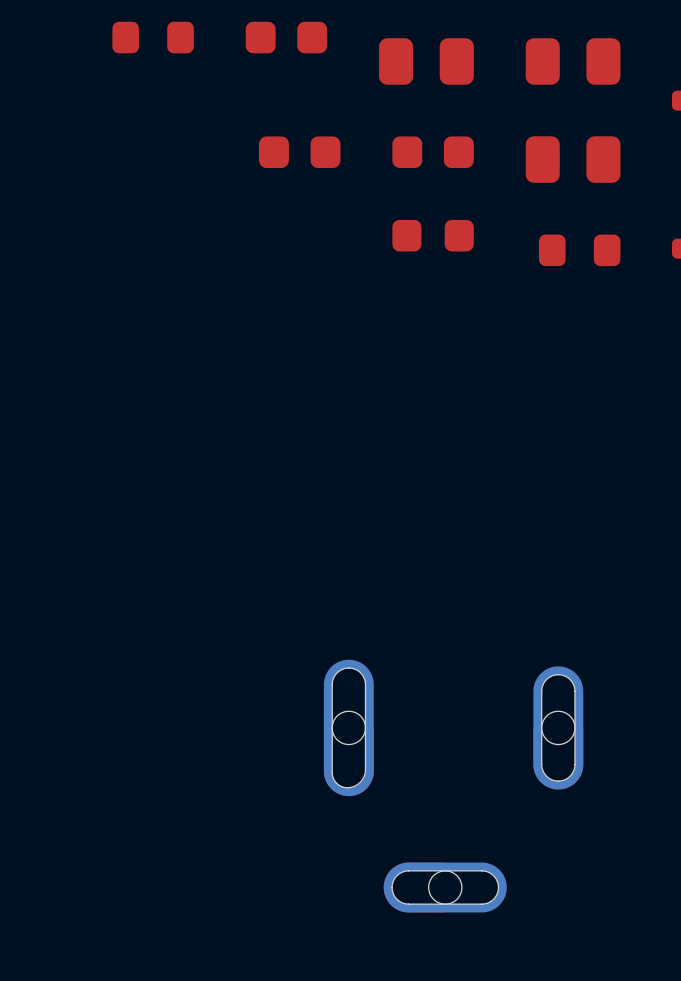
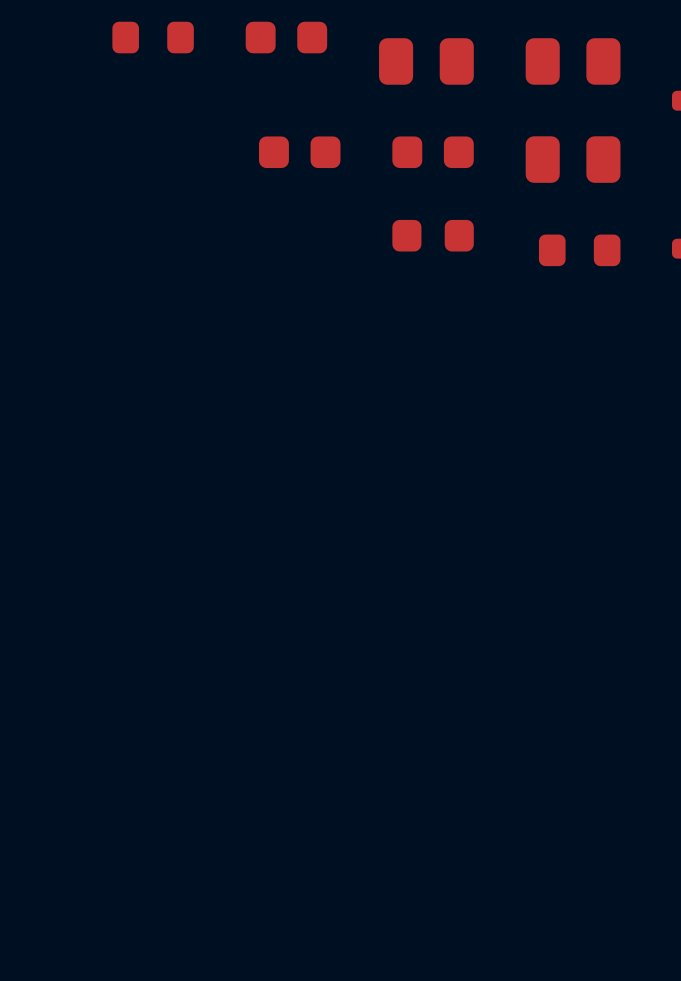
part: (453, 786) -> none

